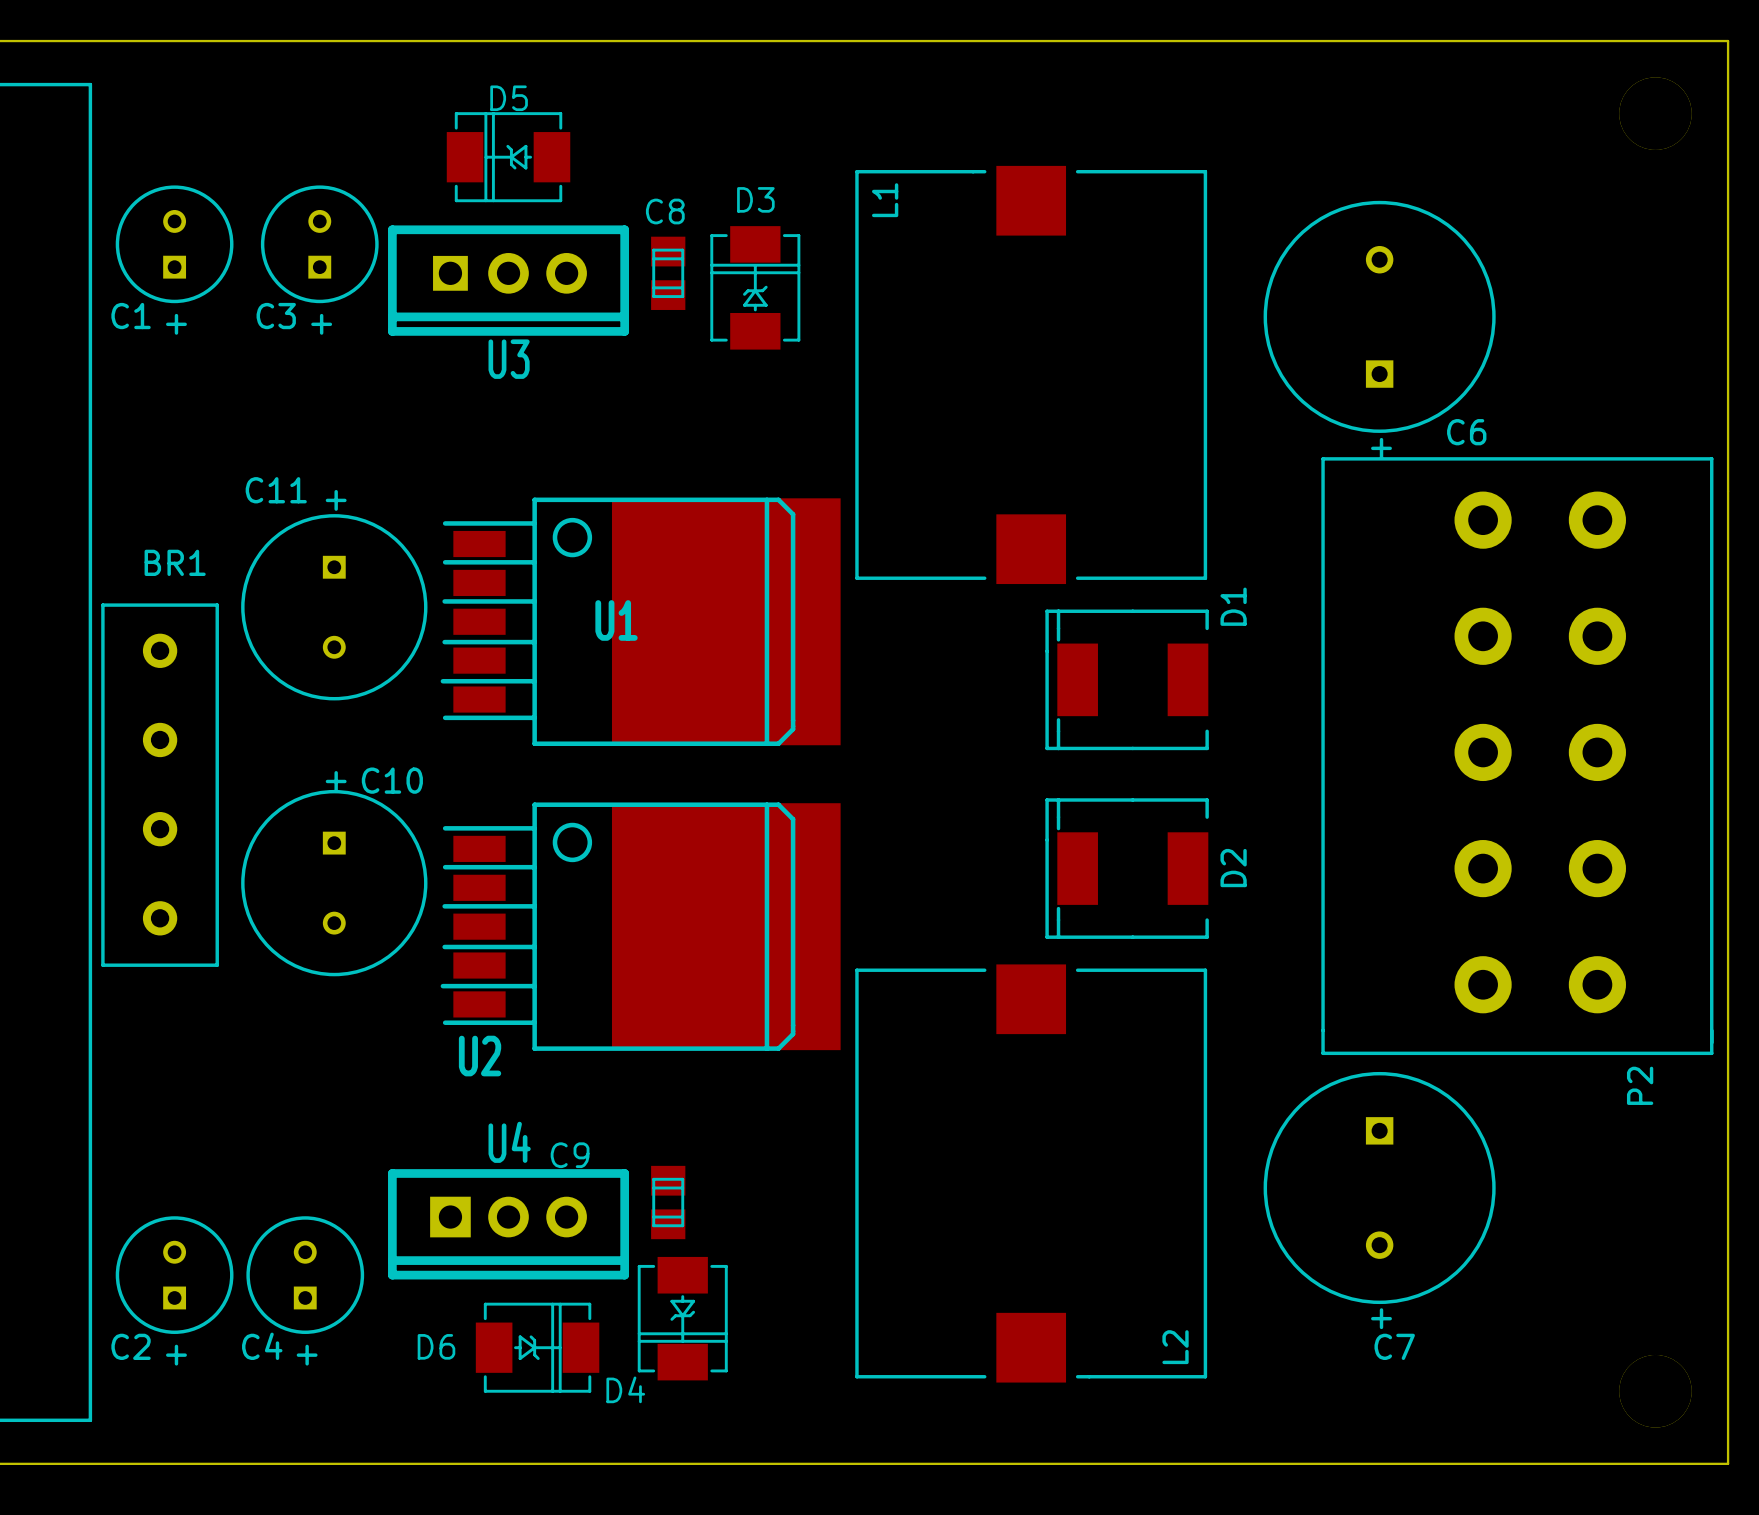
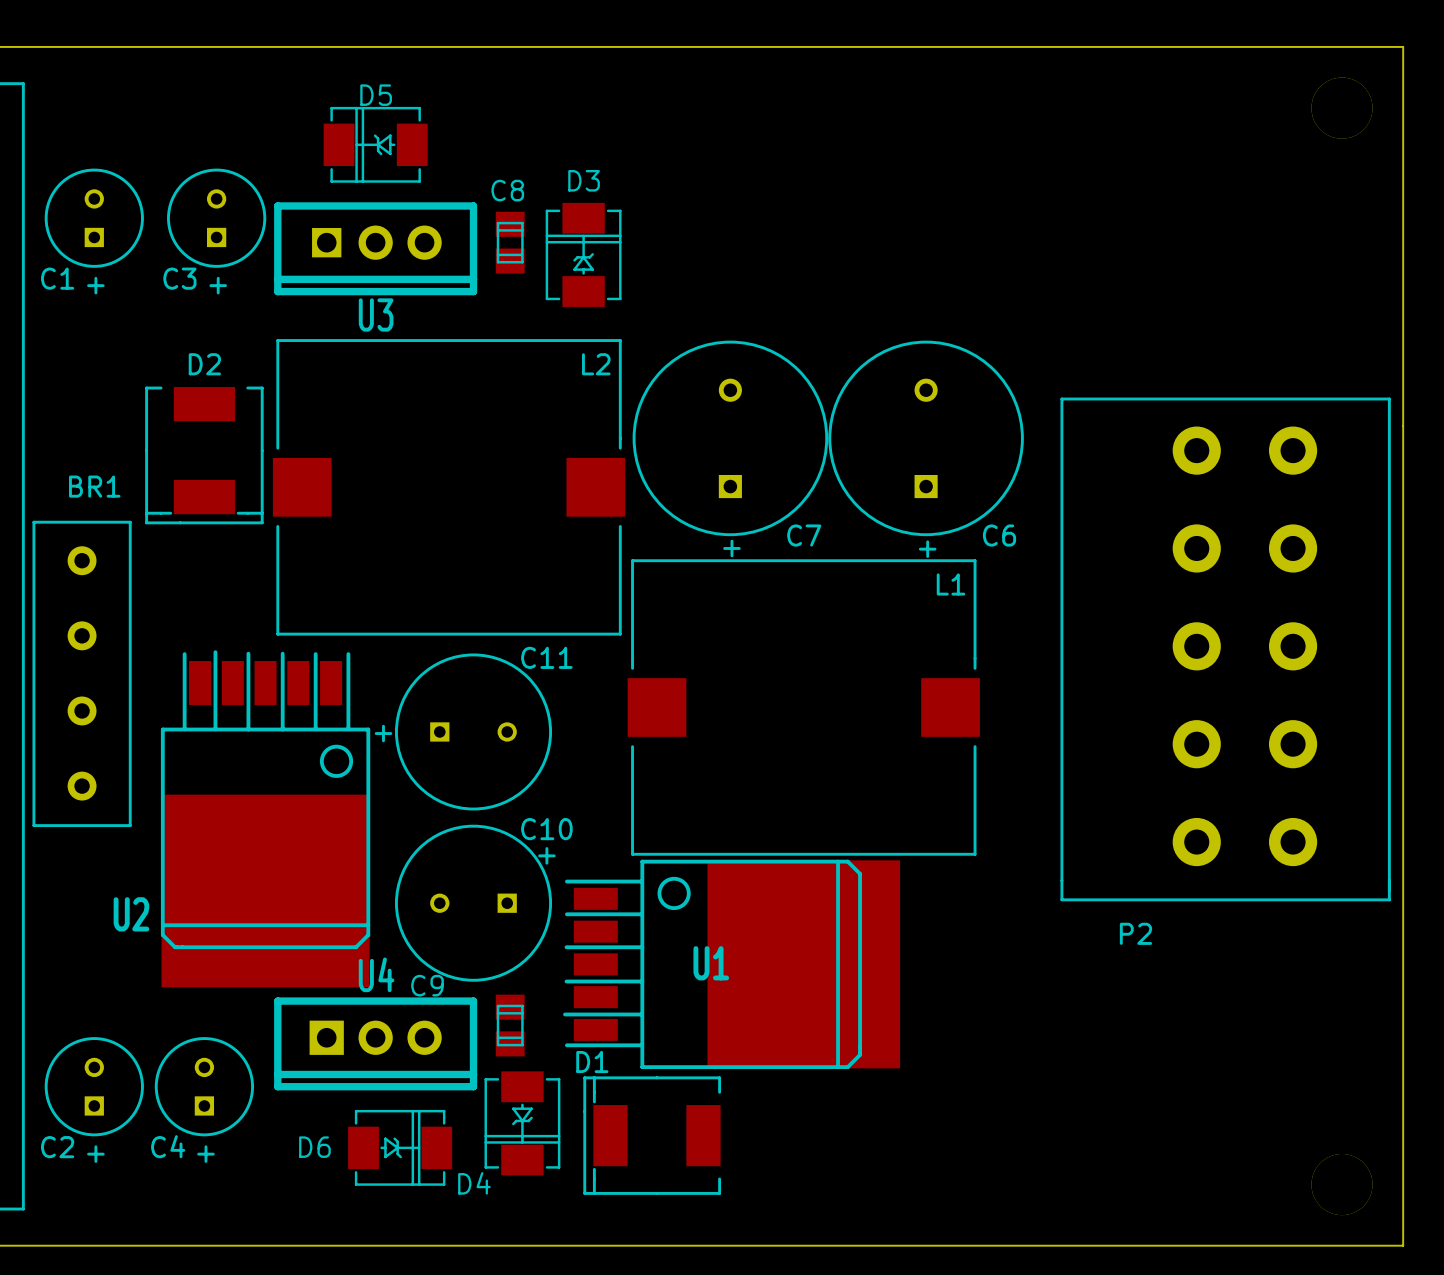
C6 position: (1379, 316) -> (926, 438)
L1 rotation: 0° (1031, 374) -> 90° clockwise (803, 707)
L1 position: (1031, 374) -> (803, 707)
C11 name position: C11 (276, 490) -> C11 (546, 657)
D1 name rotation: 0° (1233, 606) -> 90° clockwise (592, 1062)
D1 name position: D1 (1233, 606) -> D1 (592, 1062)
C11 rotation: 0° (334, 607) -> 90° counterclockwise (473, 731)
C11 position: (334, 607) -> (473, 731)
U1 position: (640, 621) -> (731, 964)
D1 position: (1127, 679) -> (652, 1135)
C10 footprint: [241, 789, 428, 977] -> [395, 824, 553, 982]
D2 rotation: 0° (1127, 868) -> 90° counterclockwise (204, 455)
D2 position: (1127, 868) -> (204, 455)
U2 rotation: 0° (640, 926) -> 90° clockwise (265, 818)
U2 position: (640, 926) -> (265, 818)
C7 footprint: [1263, 1071, 1496, 1305] -> [632, 340, 829, 537]
P2 name rotation: 0° (1640, 1085) -> 90° clockwise (1135, 933)
P2 name position: P2 (1640, 1085) -> P2 (1135, 933)
L2 rotation: 0° (1031, 1173) -> 90° counterclockwise (449, 487)
L2 position: (1031, 1173) -> (449, 487)
C7 name position: C7 (1394, 1346) -> C7 (804, 535)

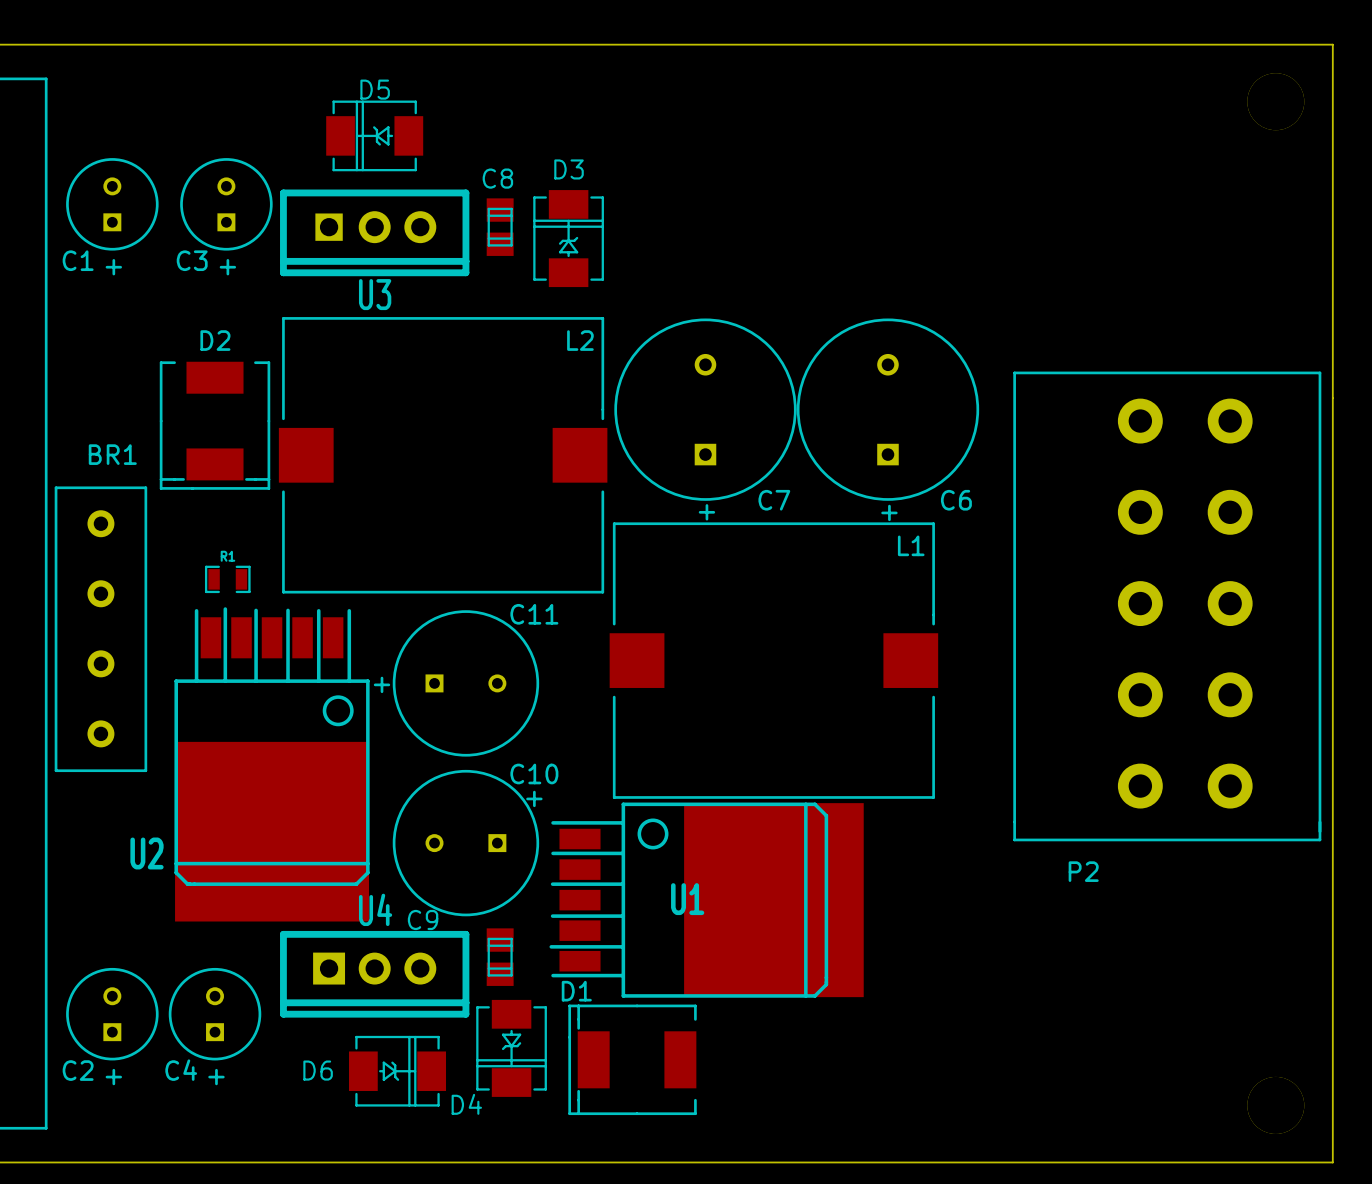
R1: none -> (227, 579)

